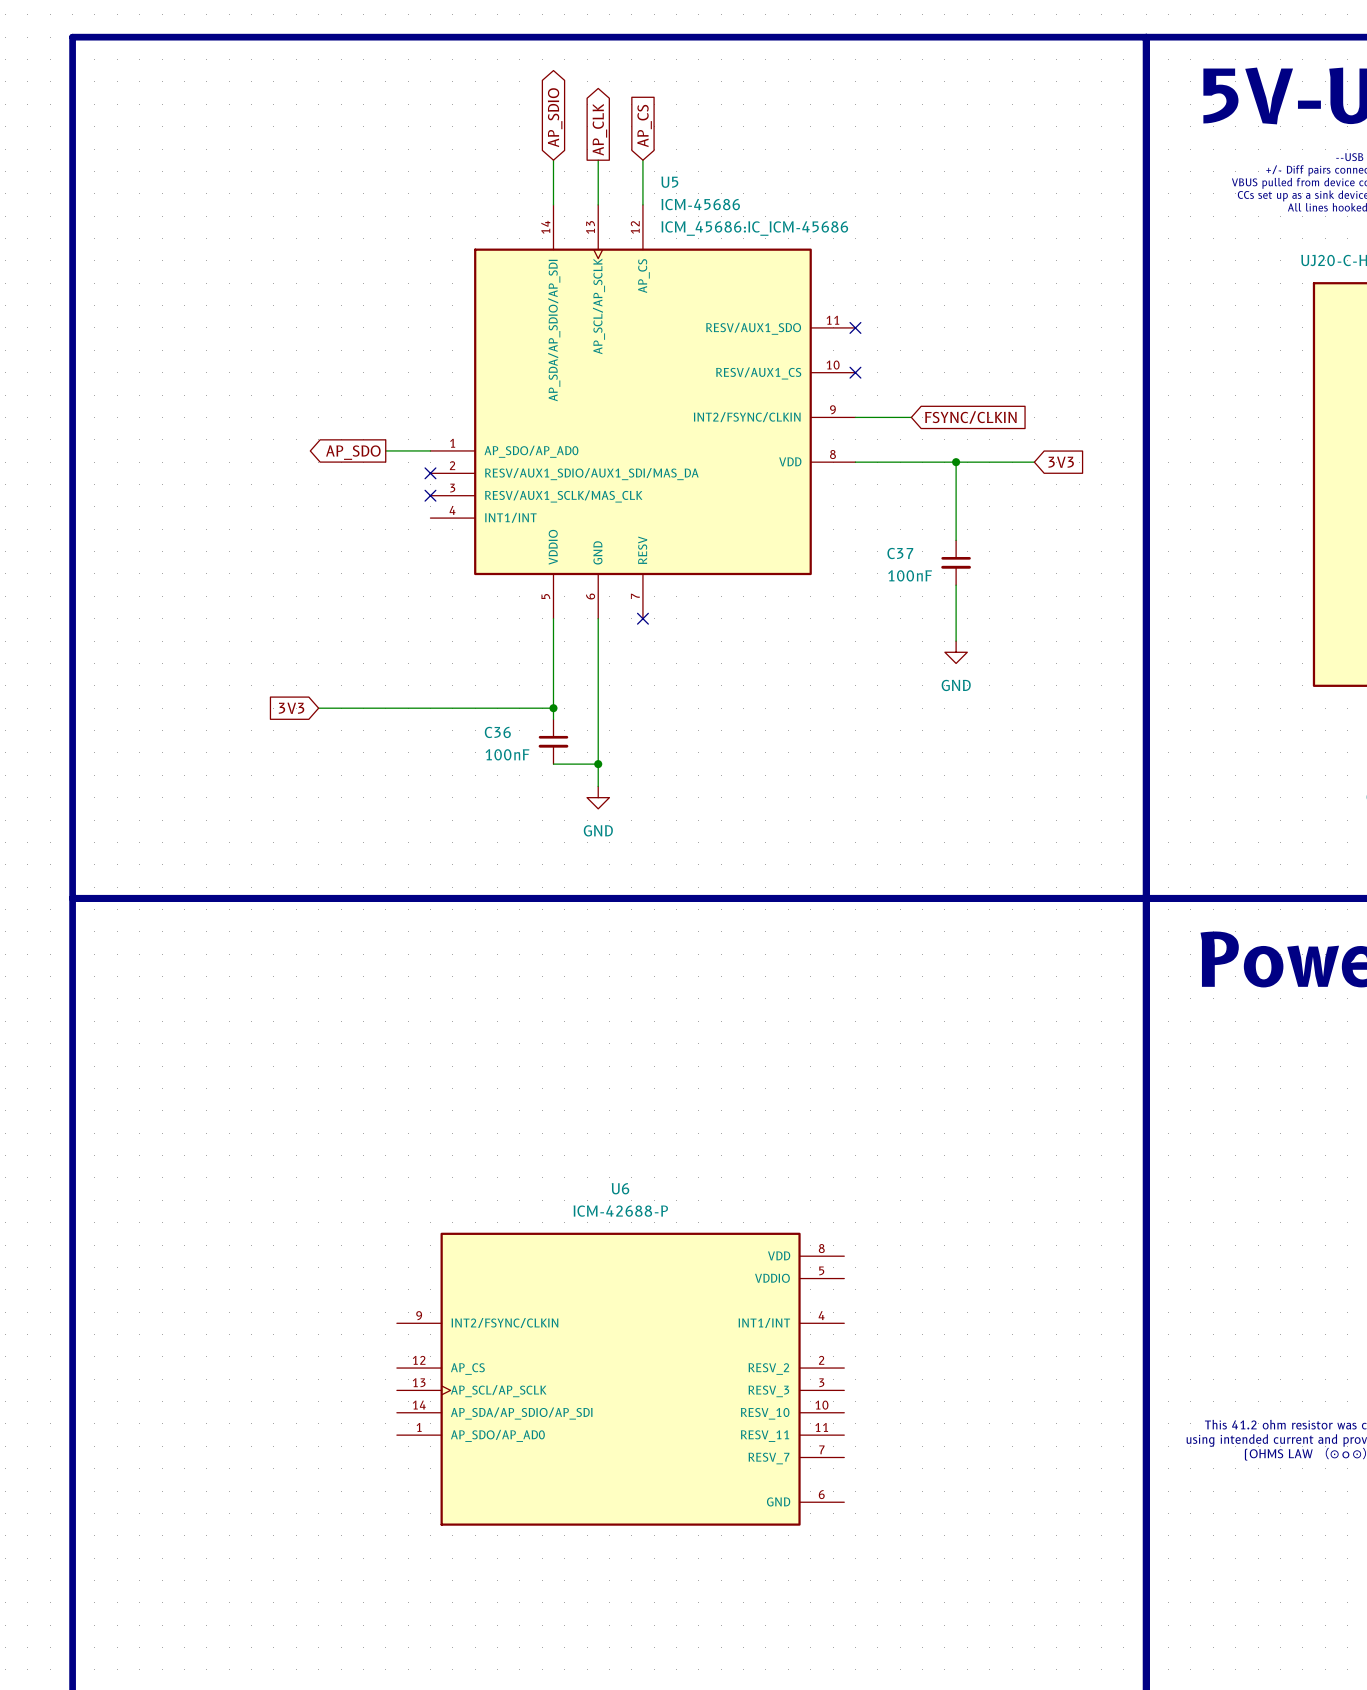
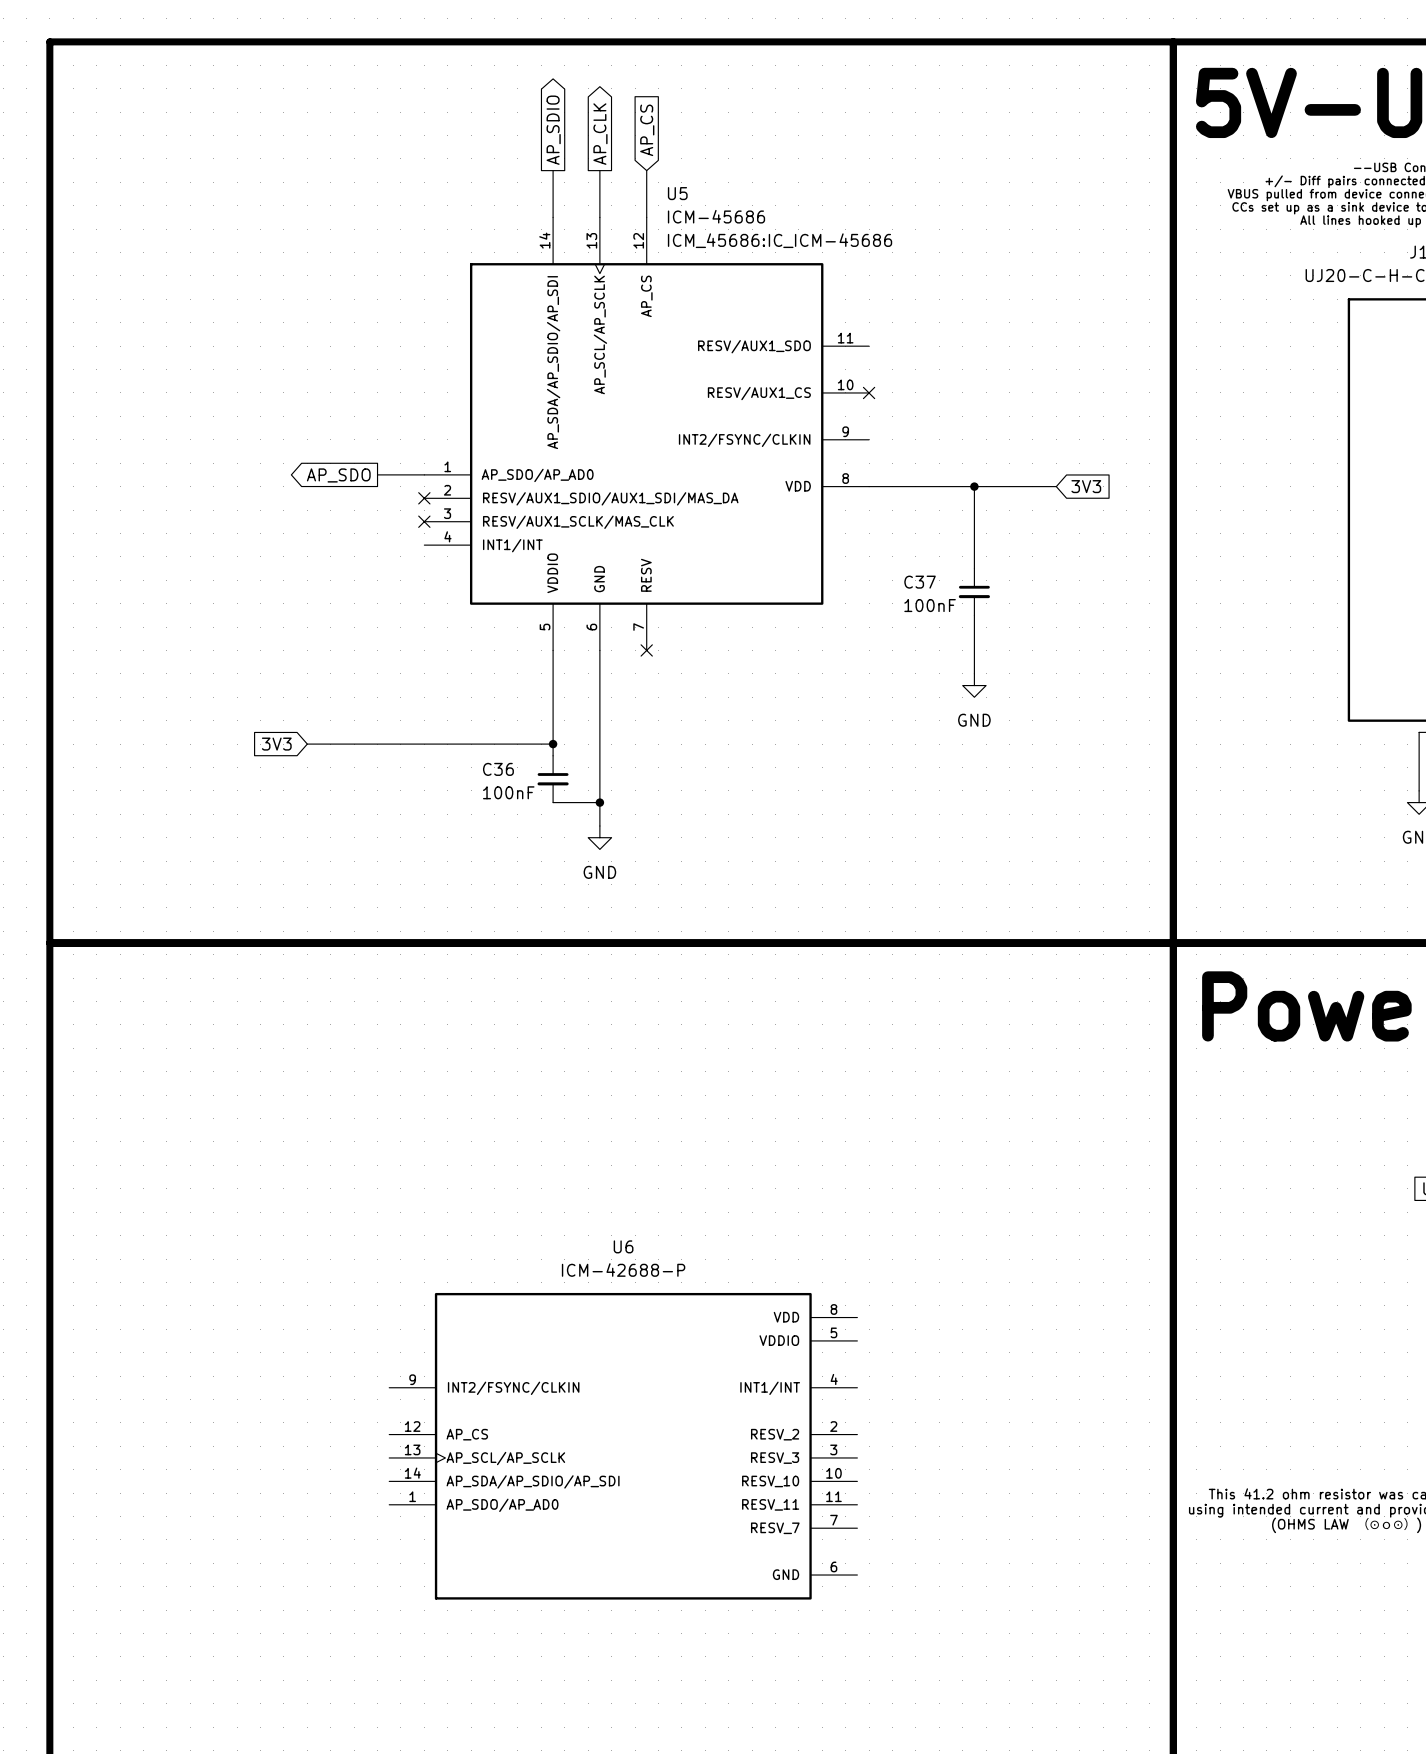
global label shape: bidirectional (555, 117) -> output (553, 130)
no-connect mark: (855, 327) -> none
wire: (855, 417) (911, 417) -> none
global label: FSYNC/CLKIN (970, 417) -> none

